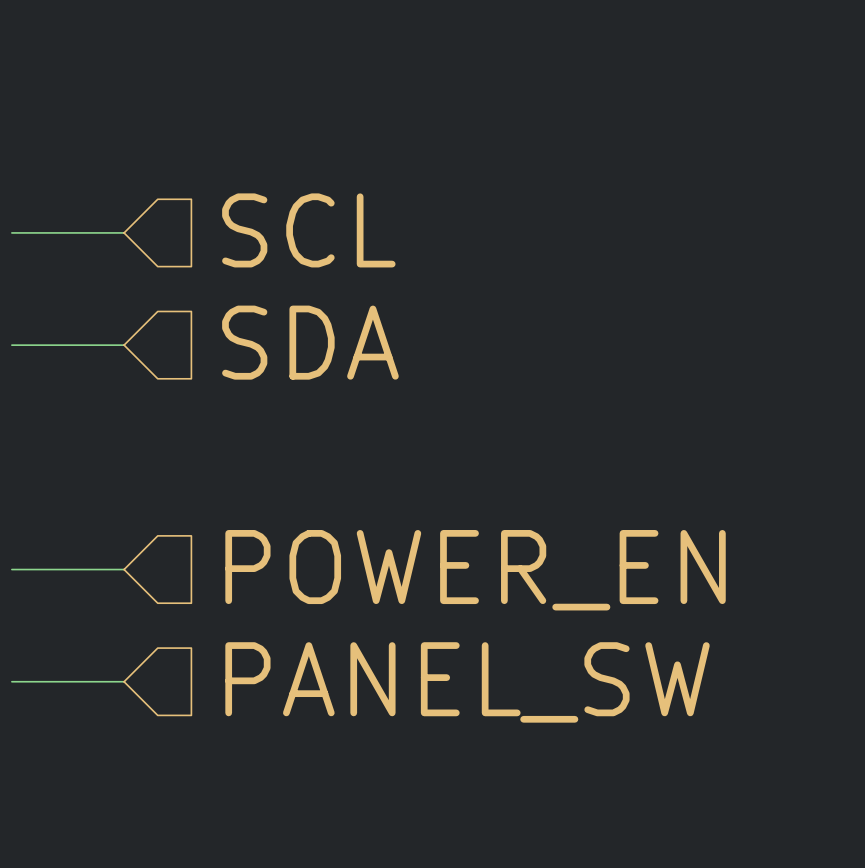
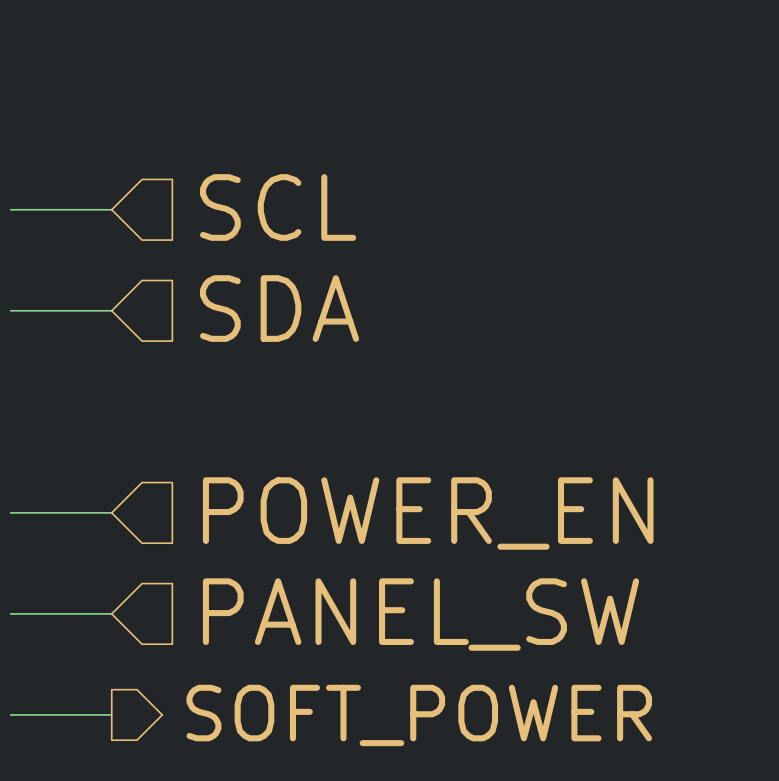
wire: none -> (10, 714) (111, 714)
hierarchical label: none -> SOFT_POWER (419, 715)

